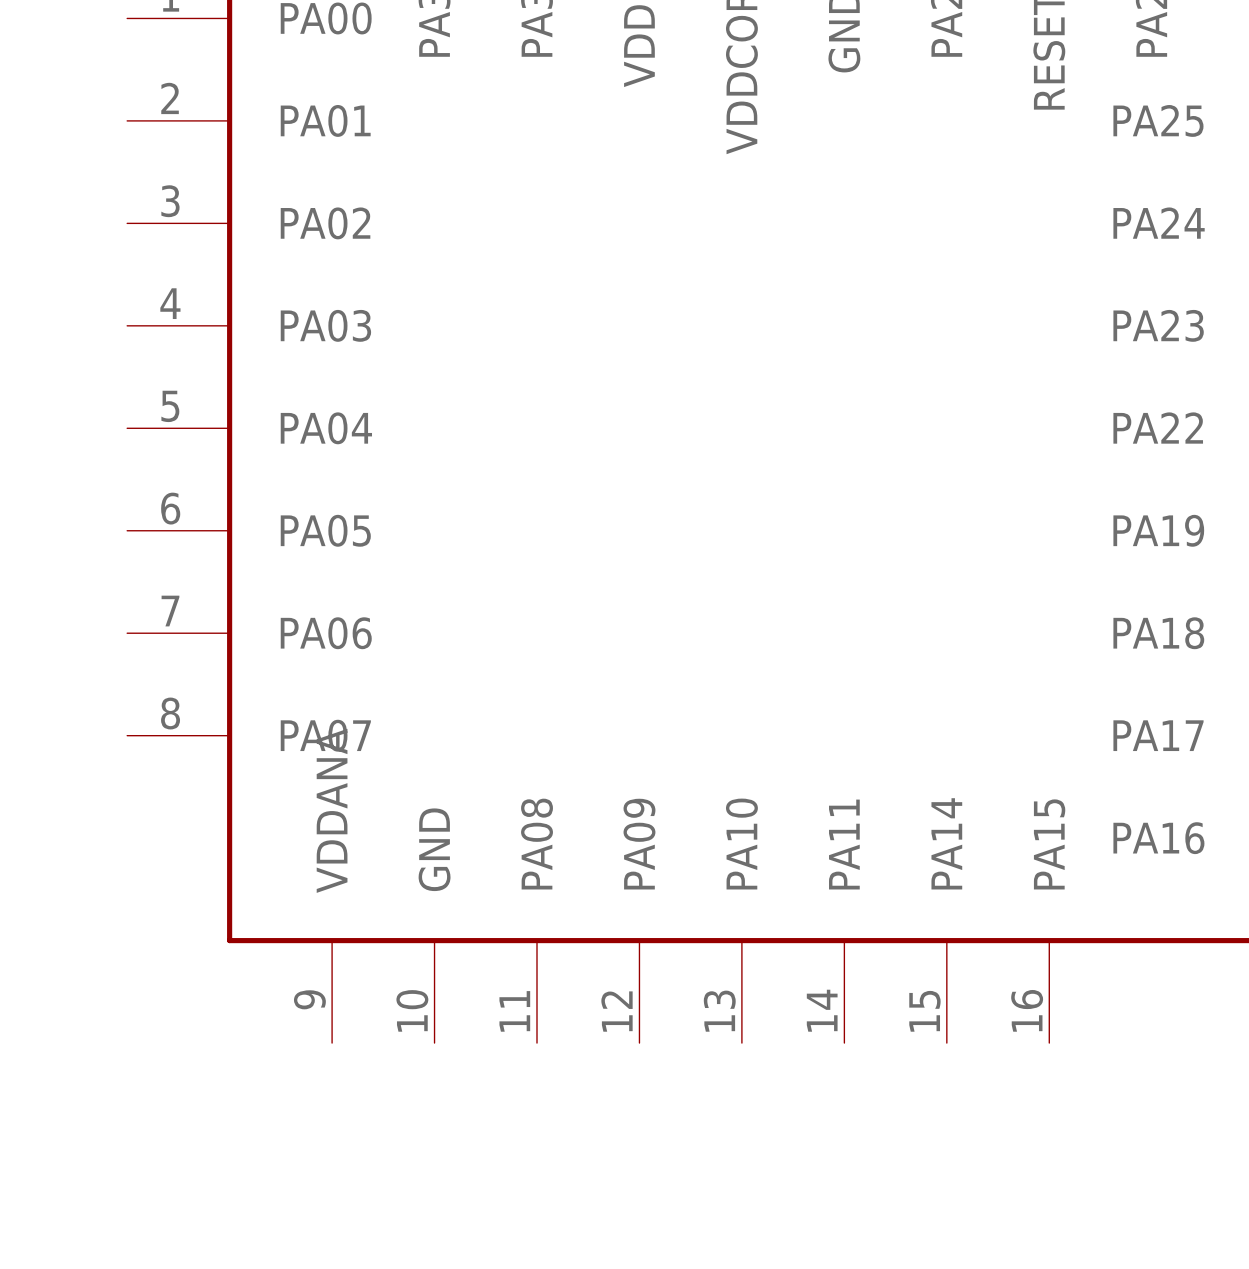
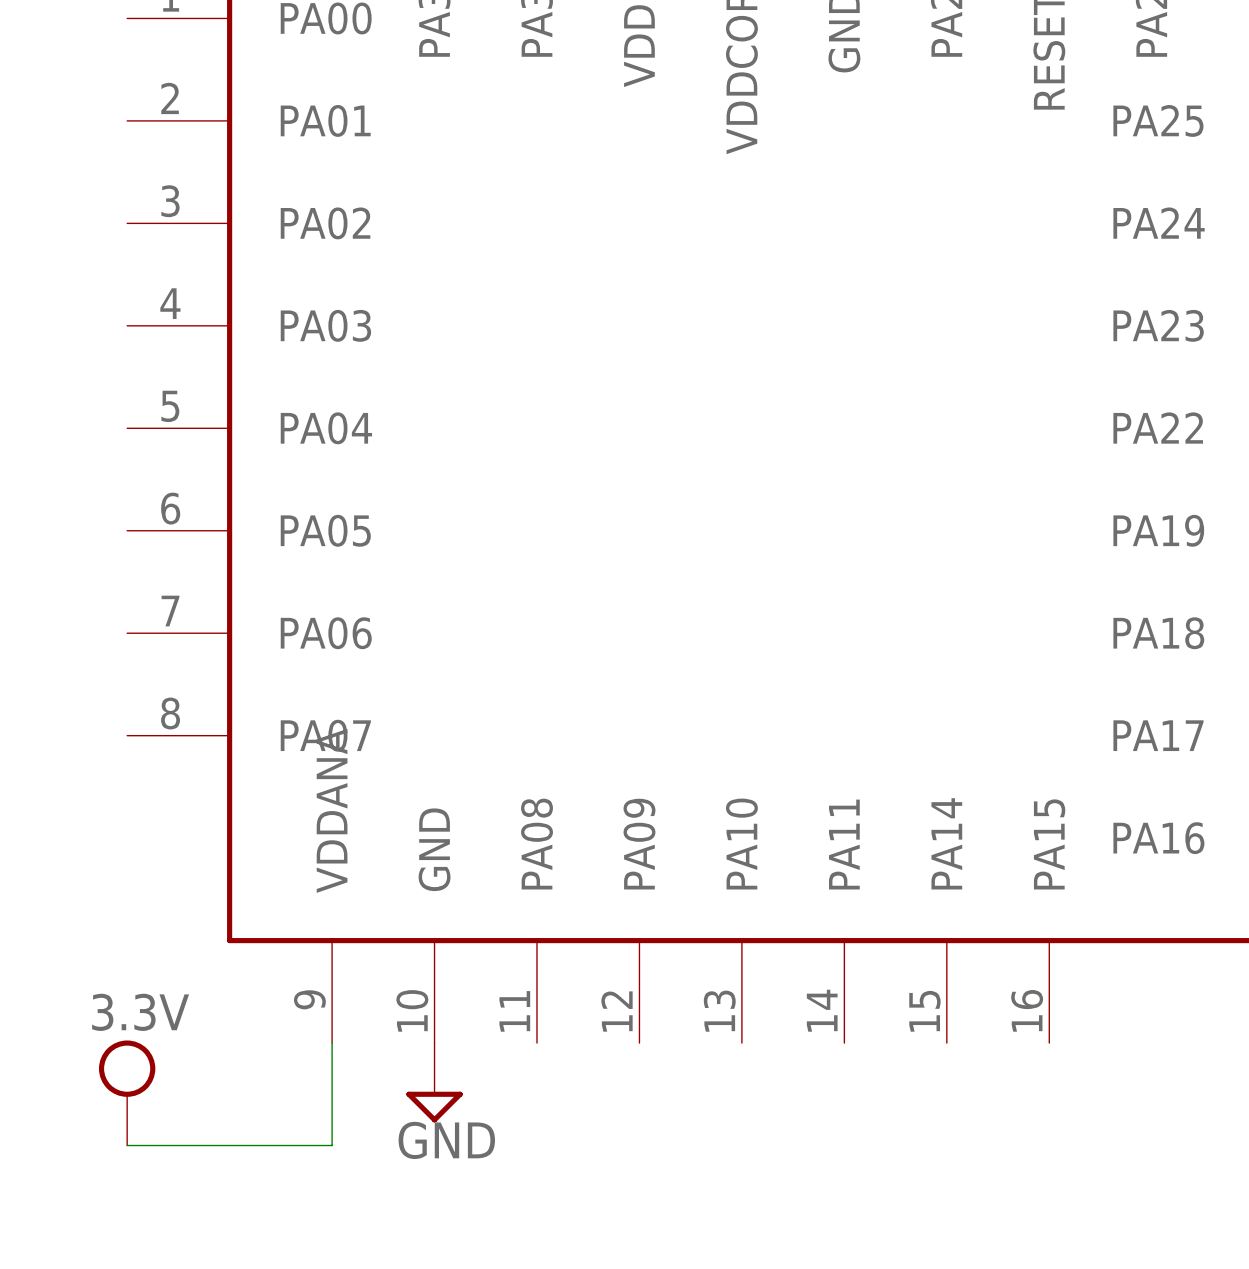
wire: none -> (332, 1043) (332, 1145) (127, 1145)
power symbol: none -> GND (434, 1082)
power symbol: none -> 3.3V (127, 1093)

